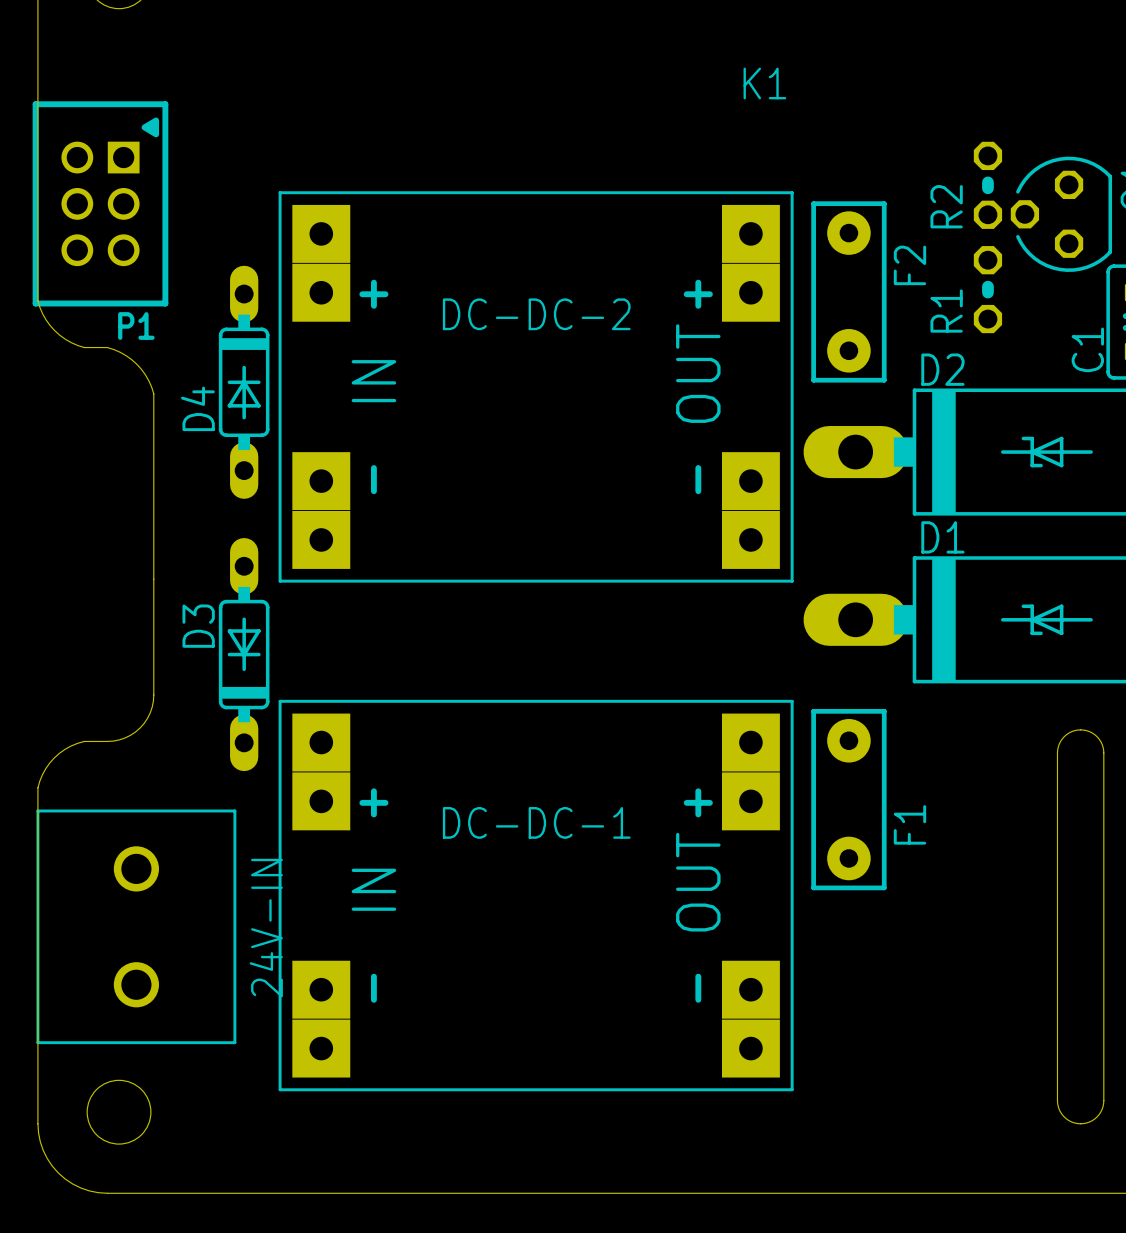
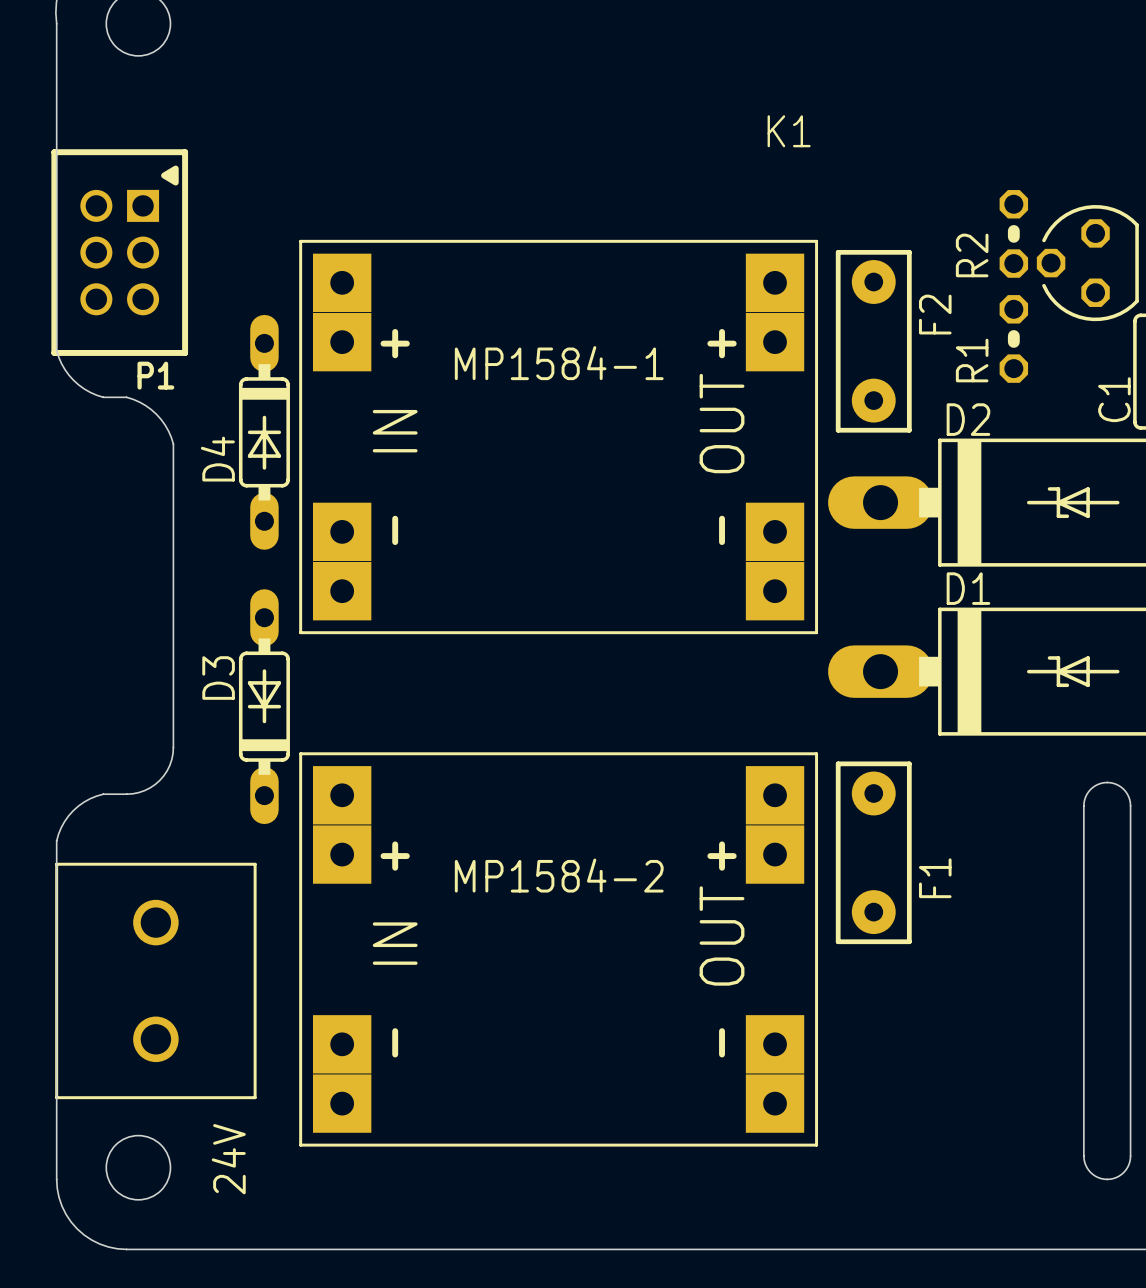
DC-DC-2 name: DC-DC-2 (536, 314) -> MP1584-1 (559, 363)
DC-DC-1 name: DC-DC-1 (536, 822) -> MP1584-2 (559, 875)
24V-IN name: 24V-IN (266, 928) -> 24V (228, 1159)

